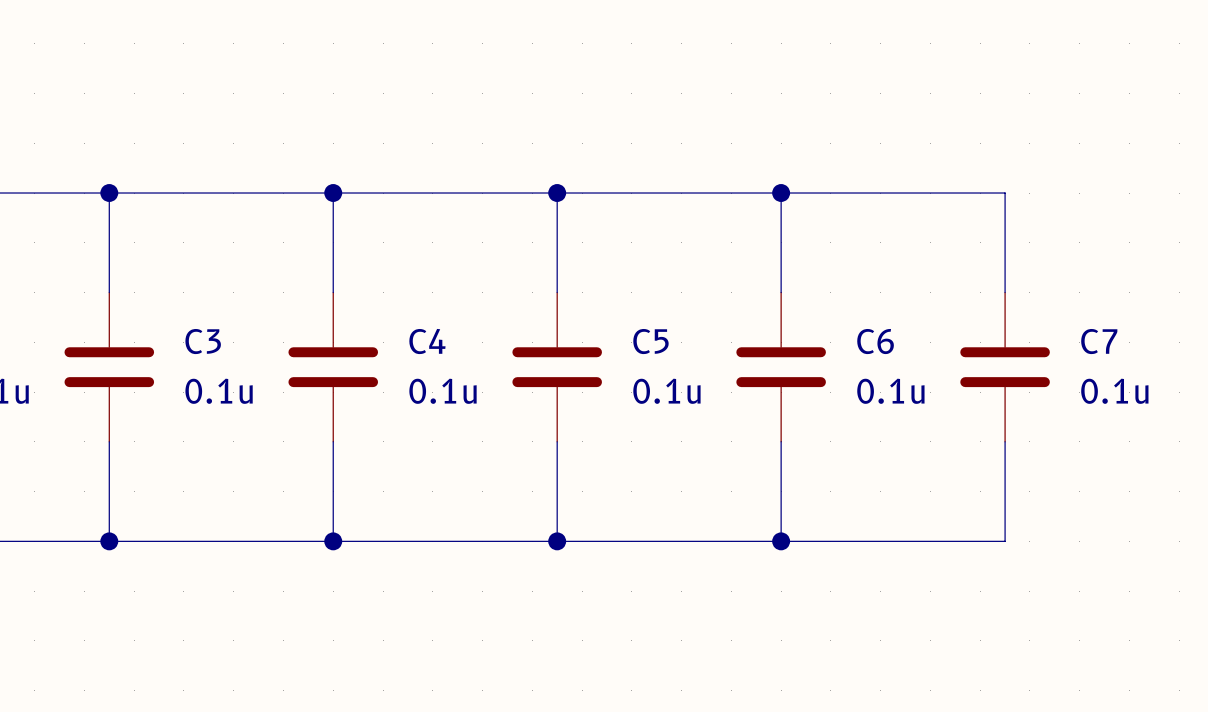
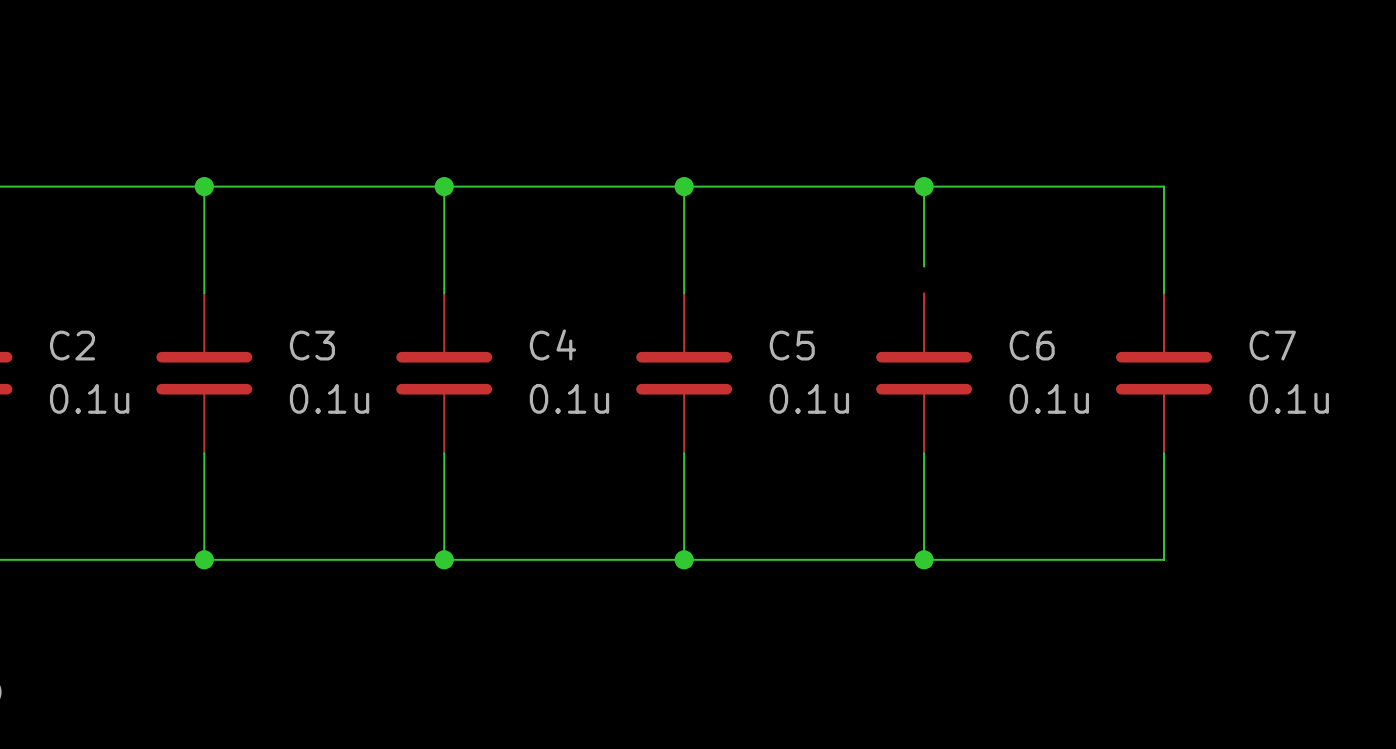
wire: (781, 267) (781, 292) -> none

